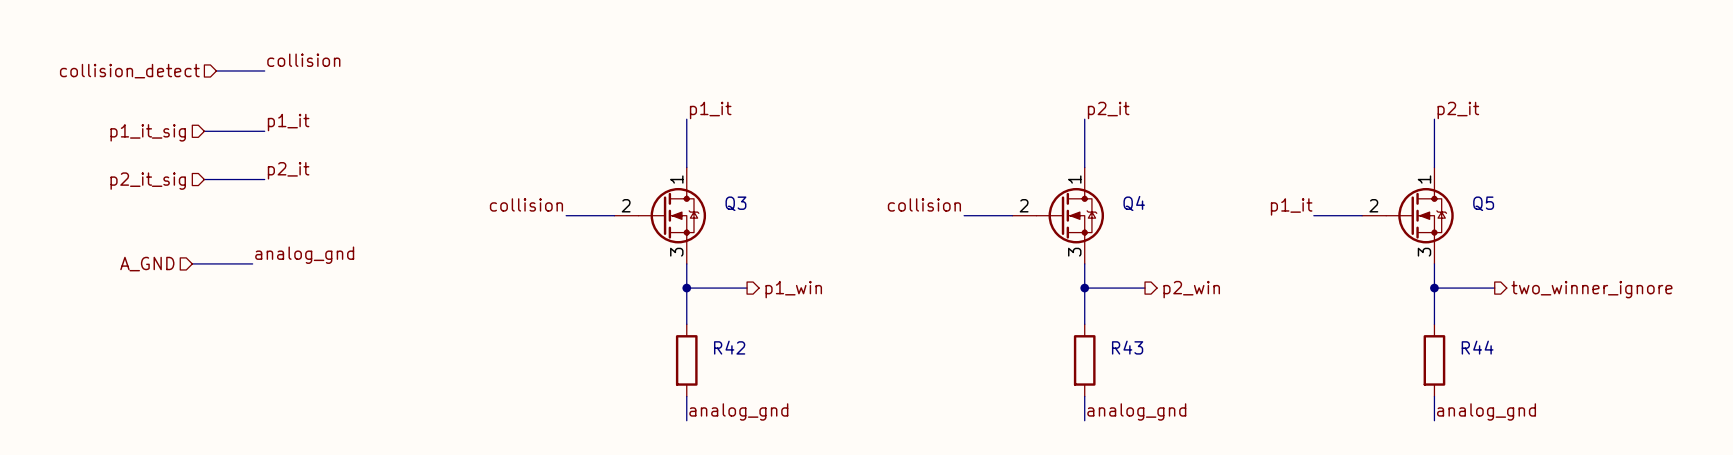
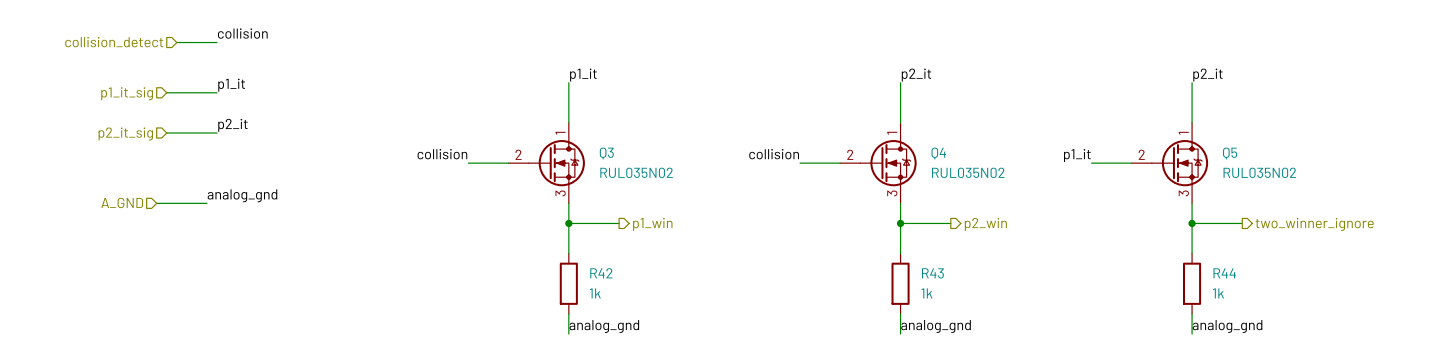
Q3 value: none -> RUL035N02 (636, 172)
Q4 value: none -> RUL035N02 (968, 172)
Q5 value: none -> RUL035N02 (1259, 172)
R42 value: none -> 1k (595, 293)
R43 value: none -> 1k (926, 293)
R44 value: none -> 1k (1218, 293)

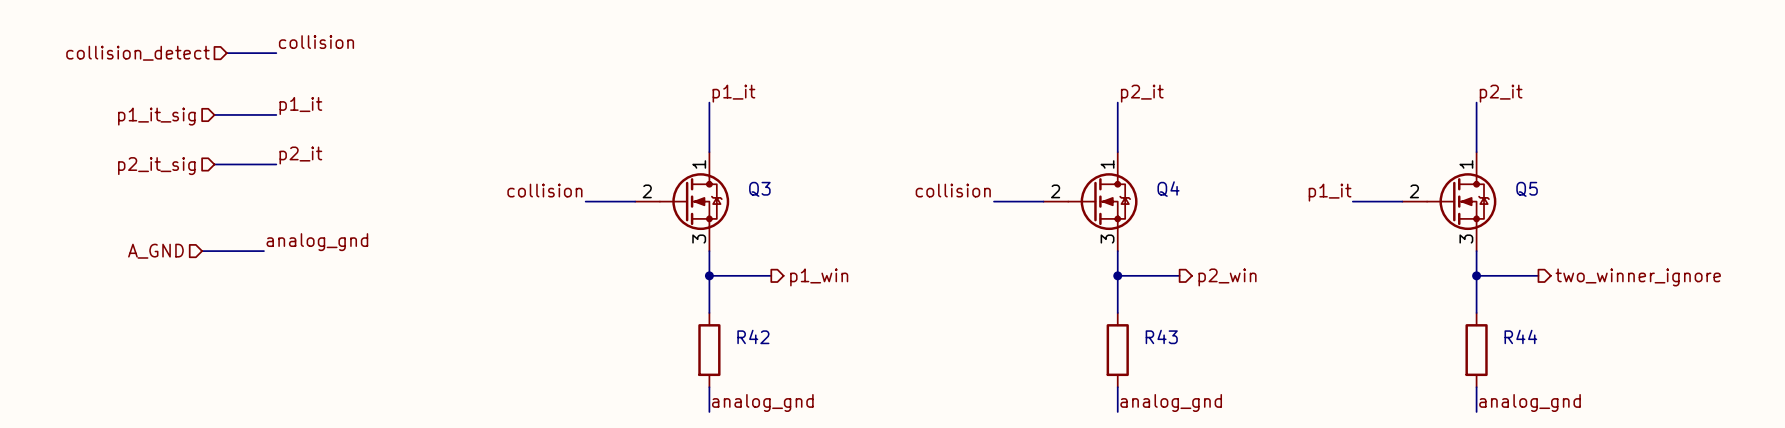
Q3 value: RUL035N02 (636, 172) -> none
Q4 value: RUL035N02 (968, 172) -> none
Q5 value: RUL035N02 (1259, 172) -> none
R42 value: 1k (595, 293) -> none
R43 value: 1k (926, 293) -> none
R44 value: 1k (1218, 293) -> none

